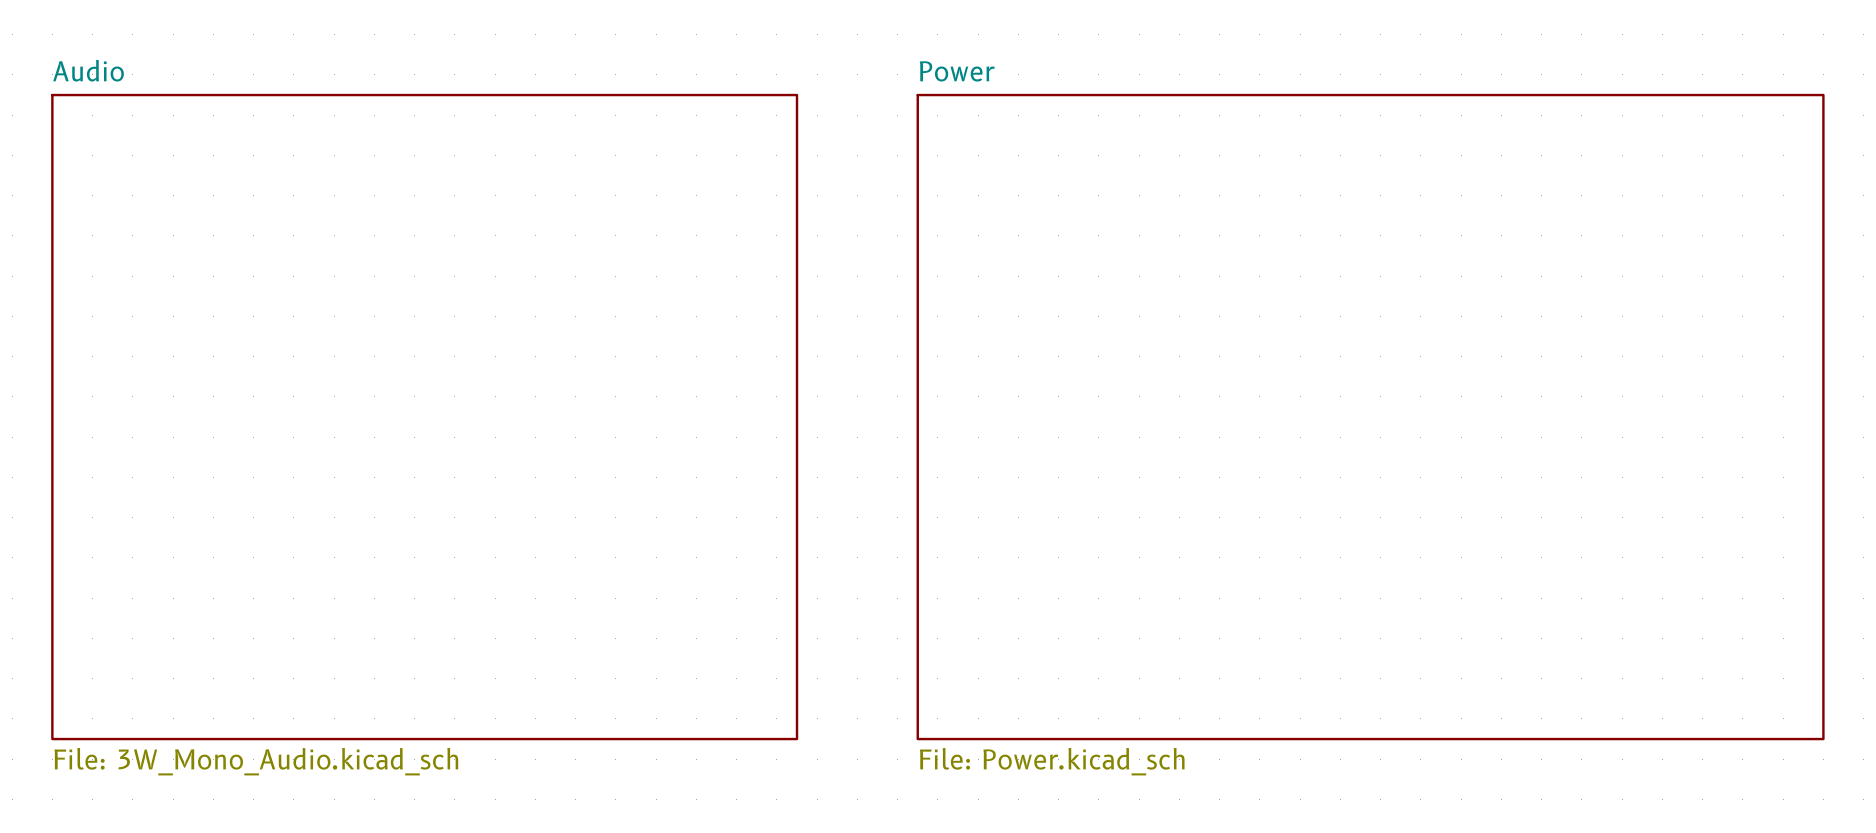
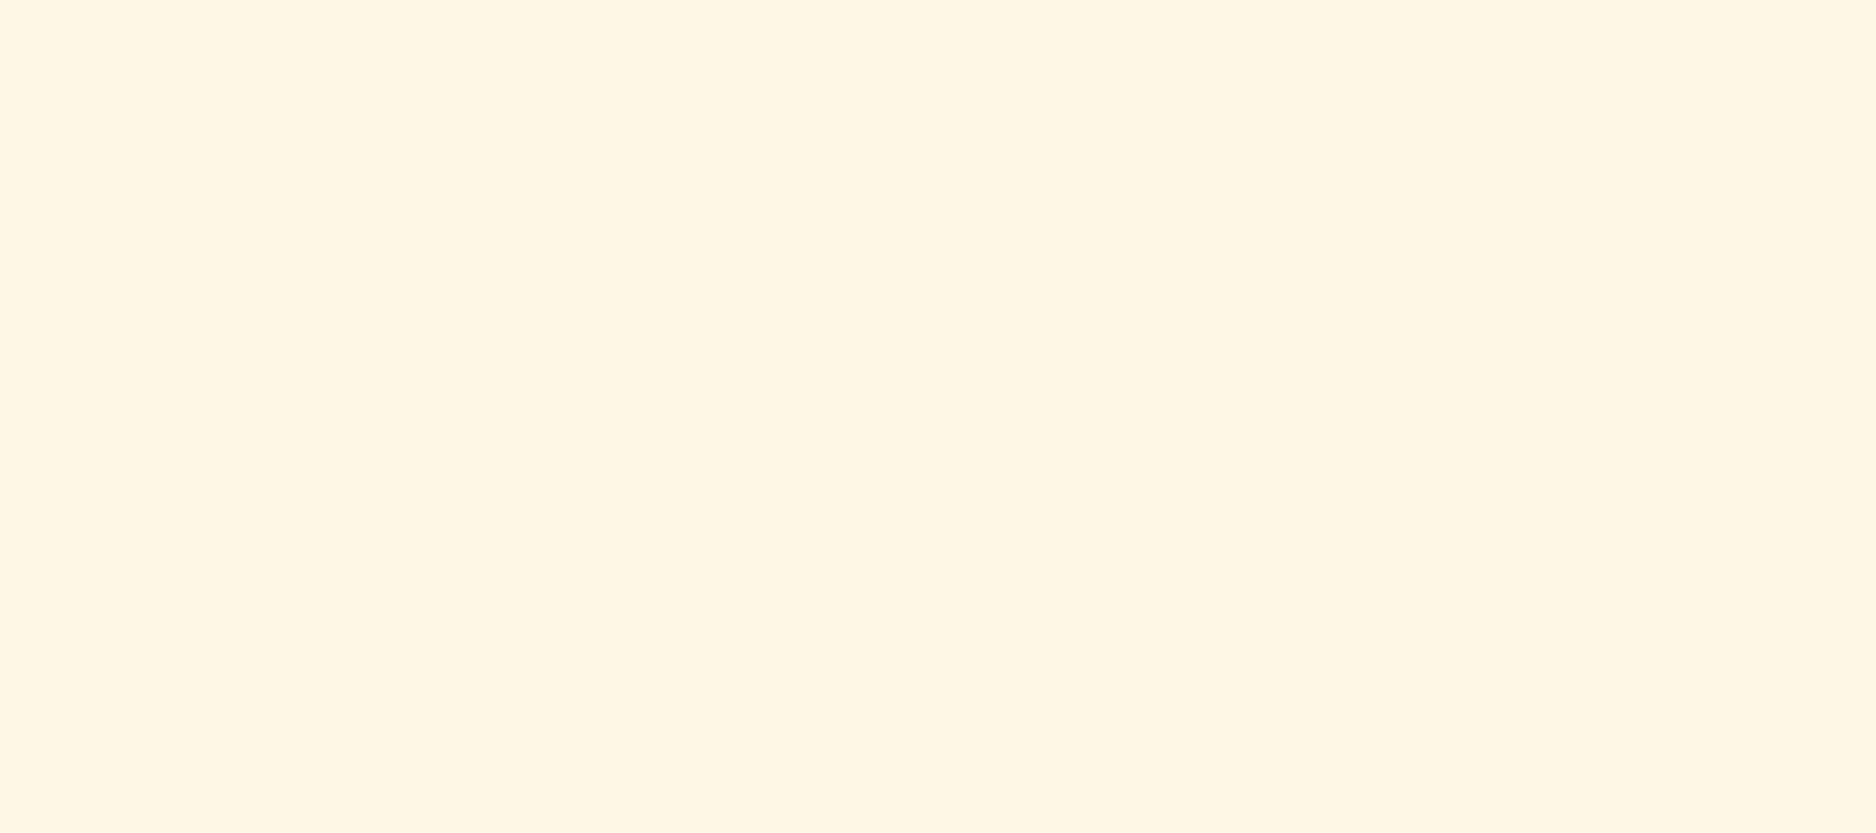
sheet Audio: File: 3W_Mono_Audio.kicad_sch (424, 417) -> none
sheet Power: File: Power.kicad_sch (1370, 417) -> none

